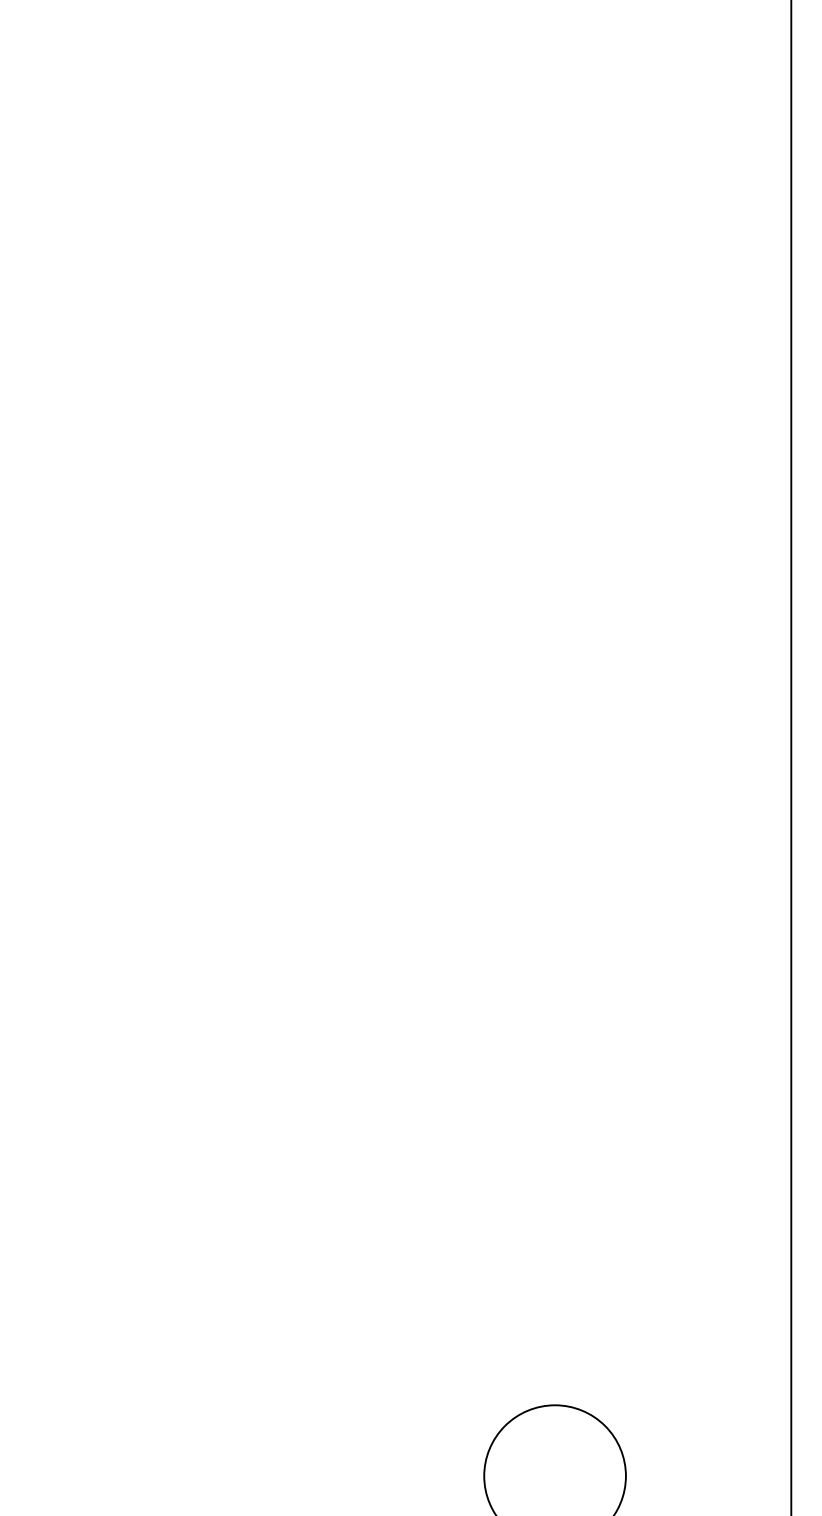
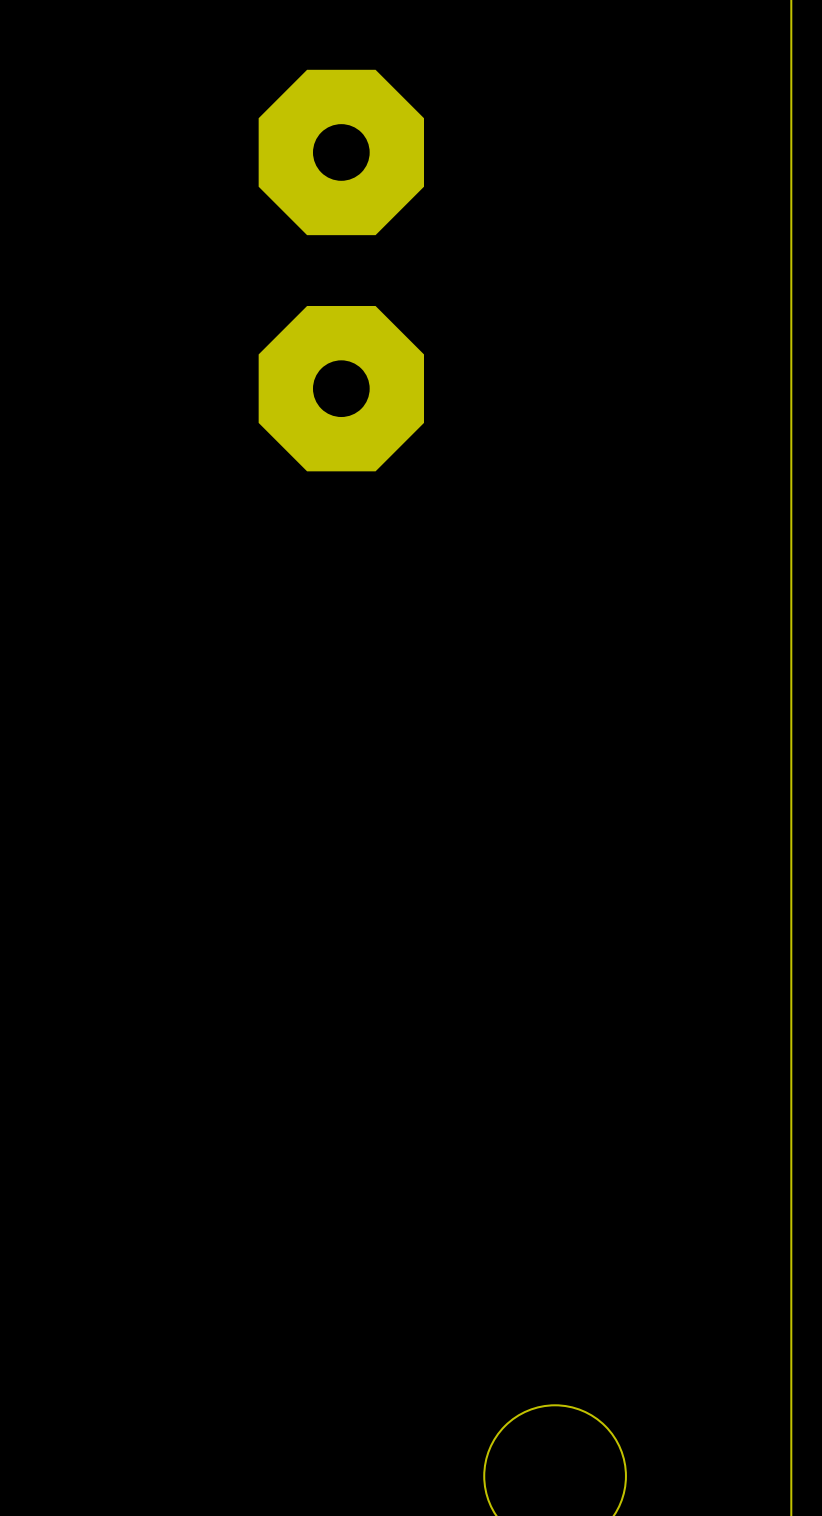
part: none -> (341, 270)

